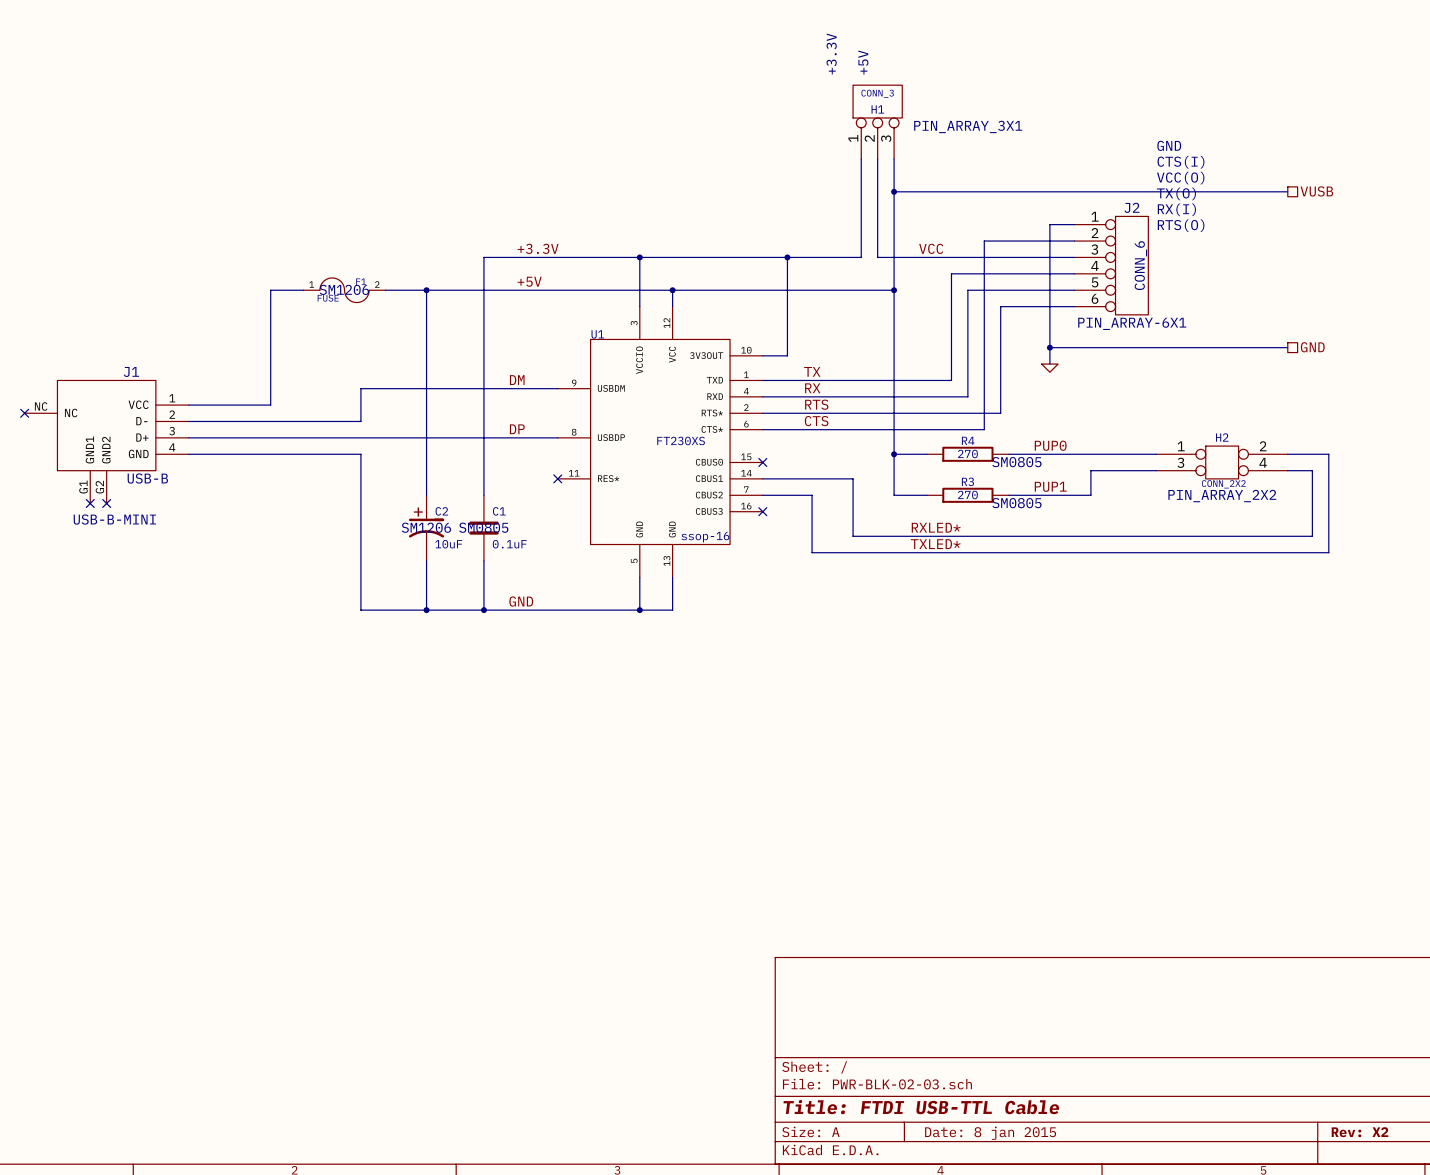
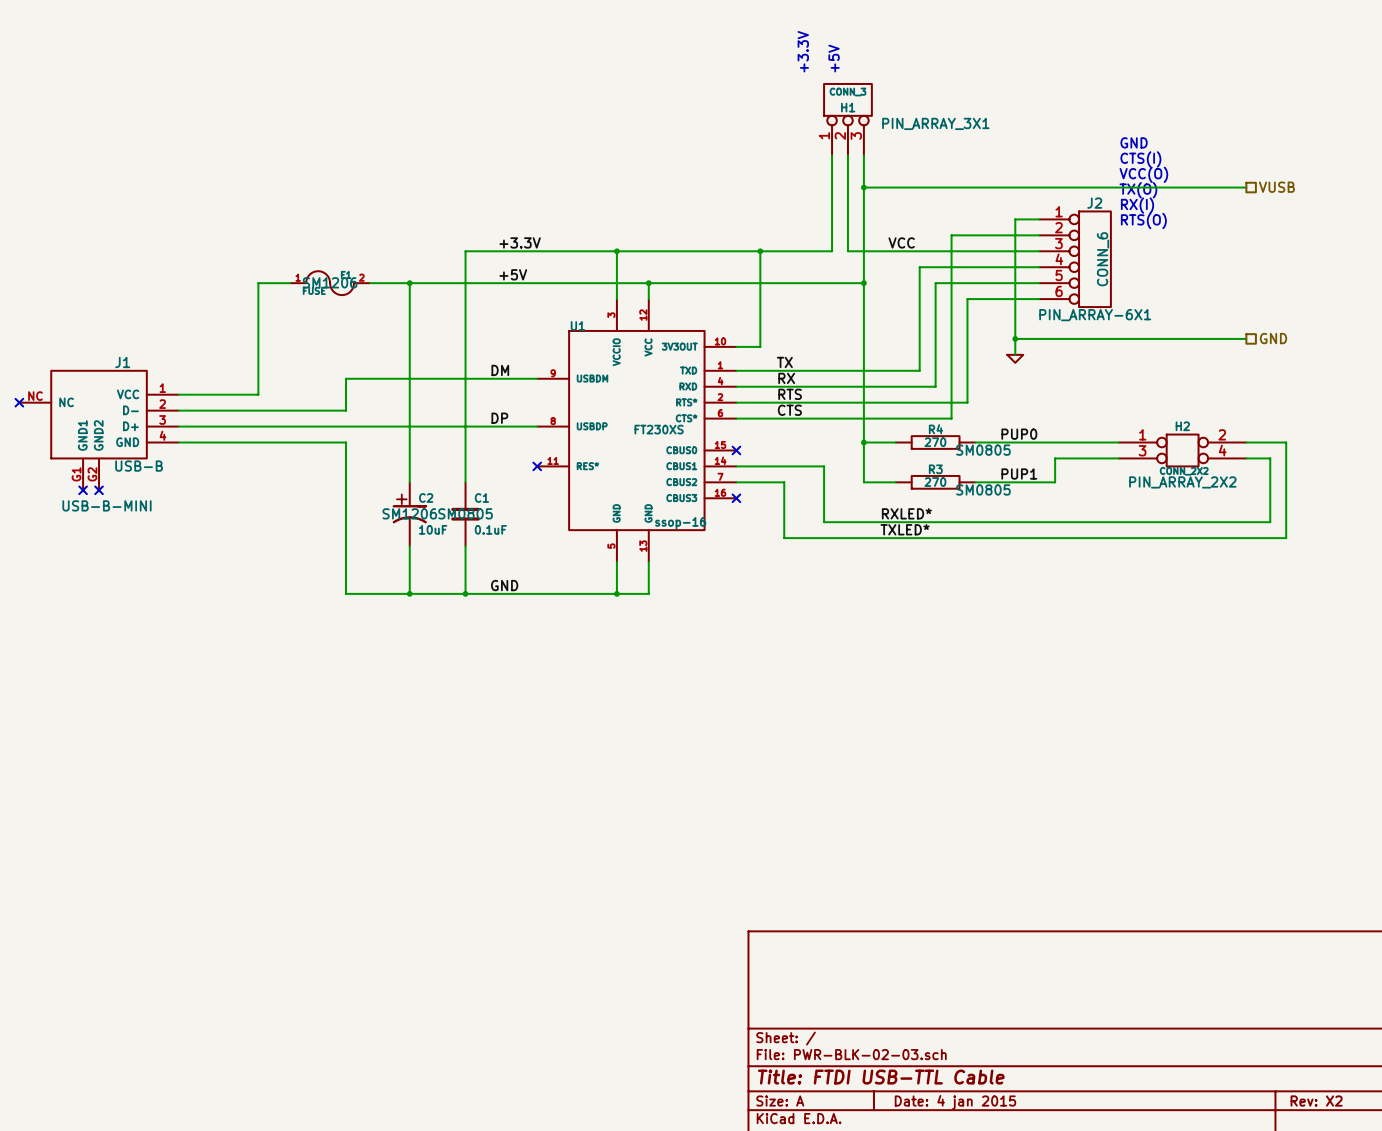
title block: Date: 8 jan 2015 (990, 1133) -> Date: 4 jan 2015 (955, 1102)

